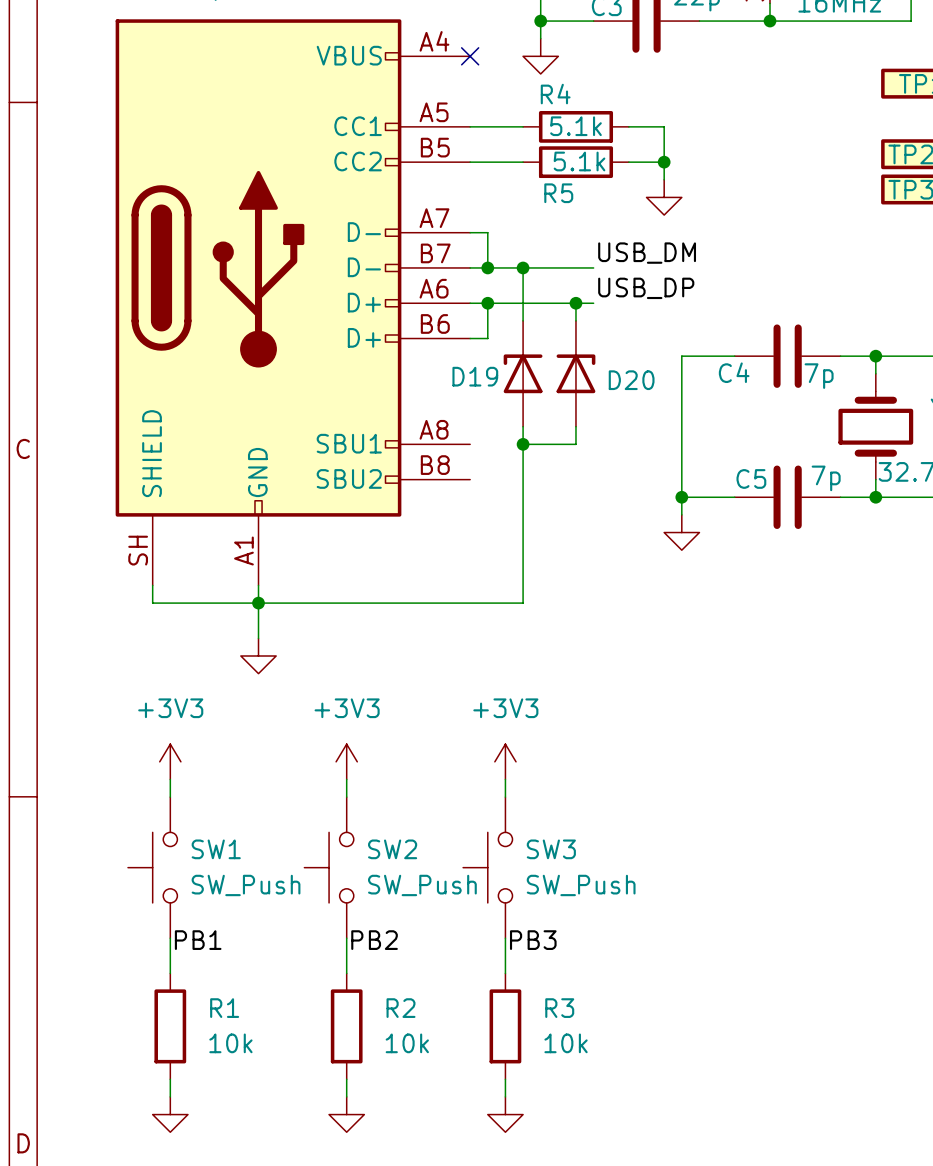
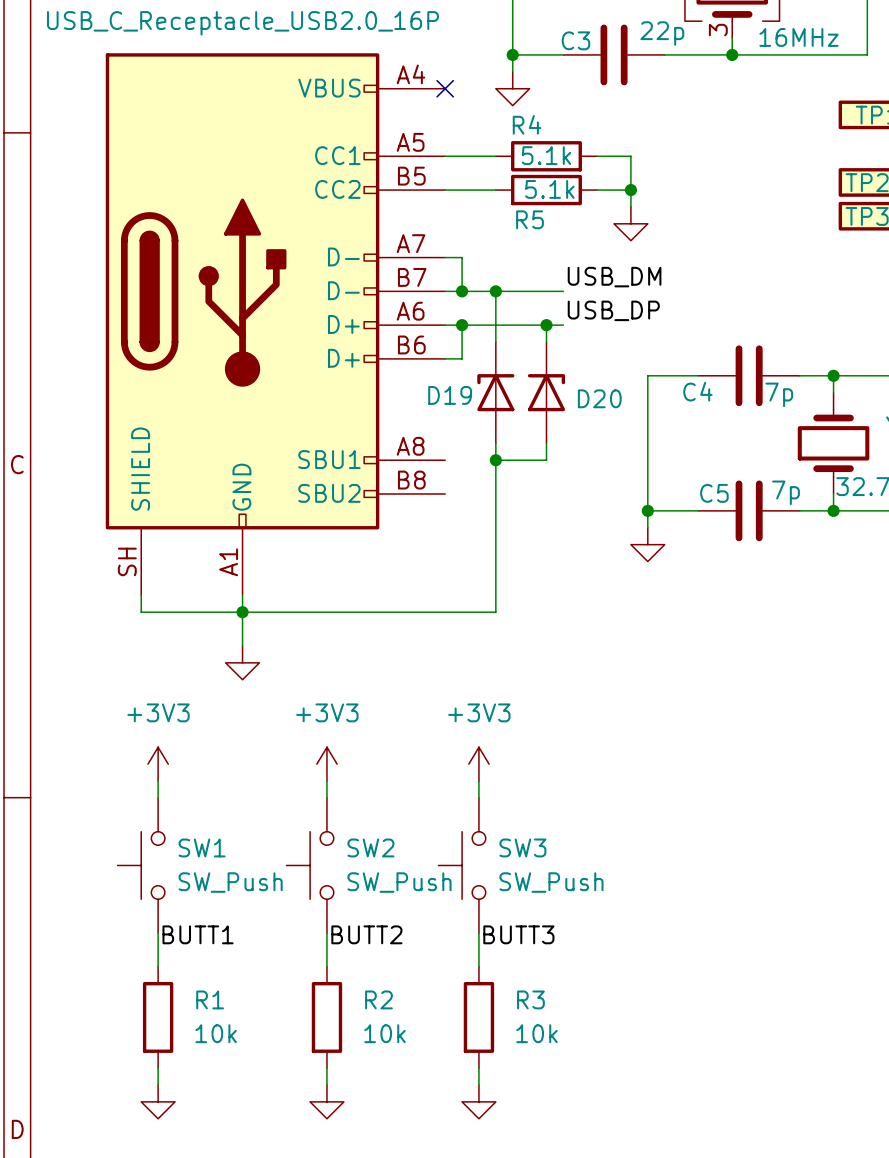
label: PB1 (198, 940) -> BUTT1 (198, 934)
label: PB2 (374, 940) -> BUTT2 (366, 934)
label: PB3 (533, 940) -> BUTT3 (518, 934)

